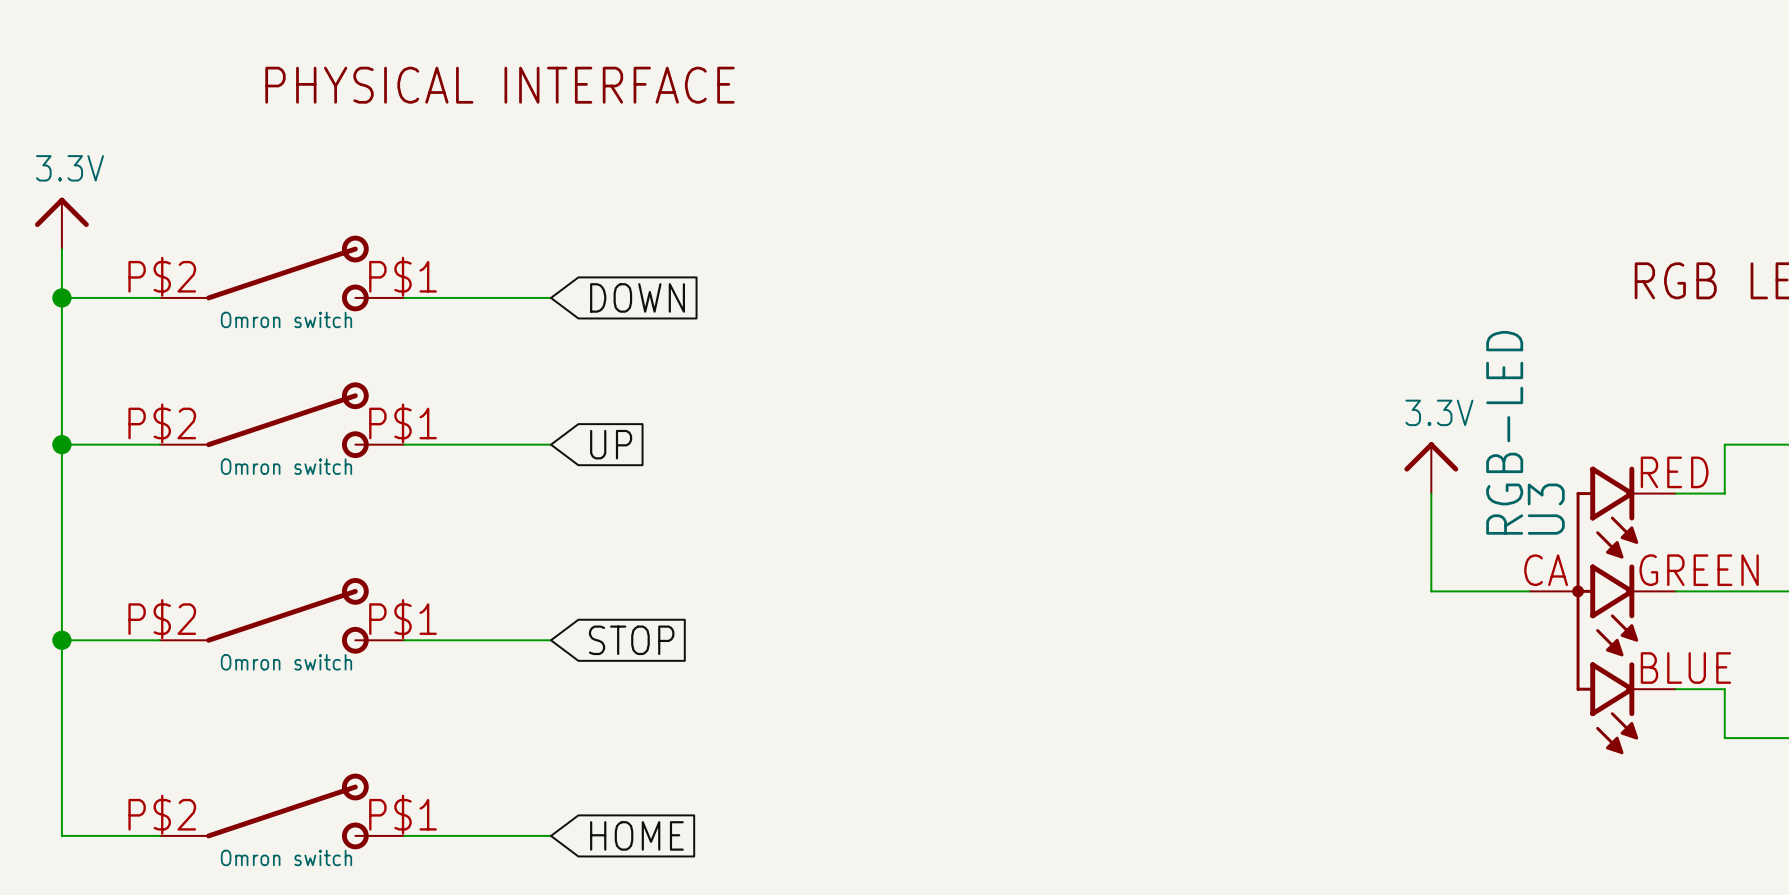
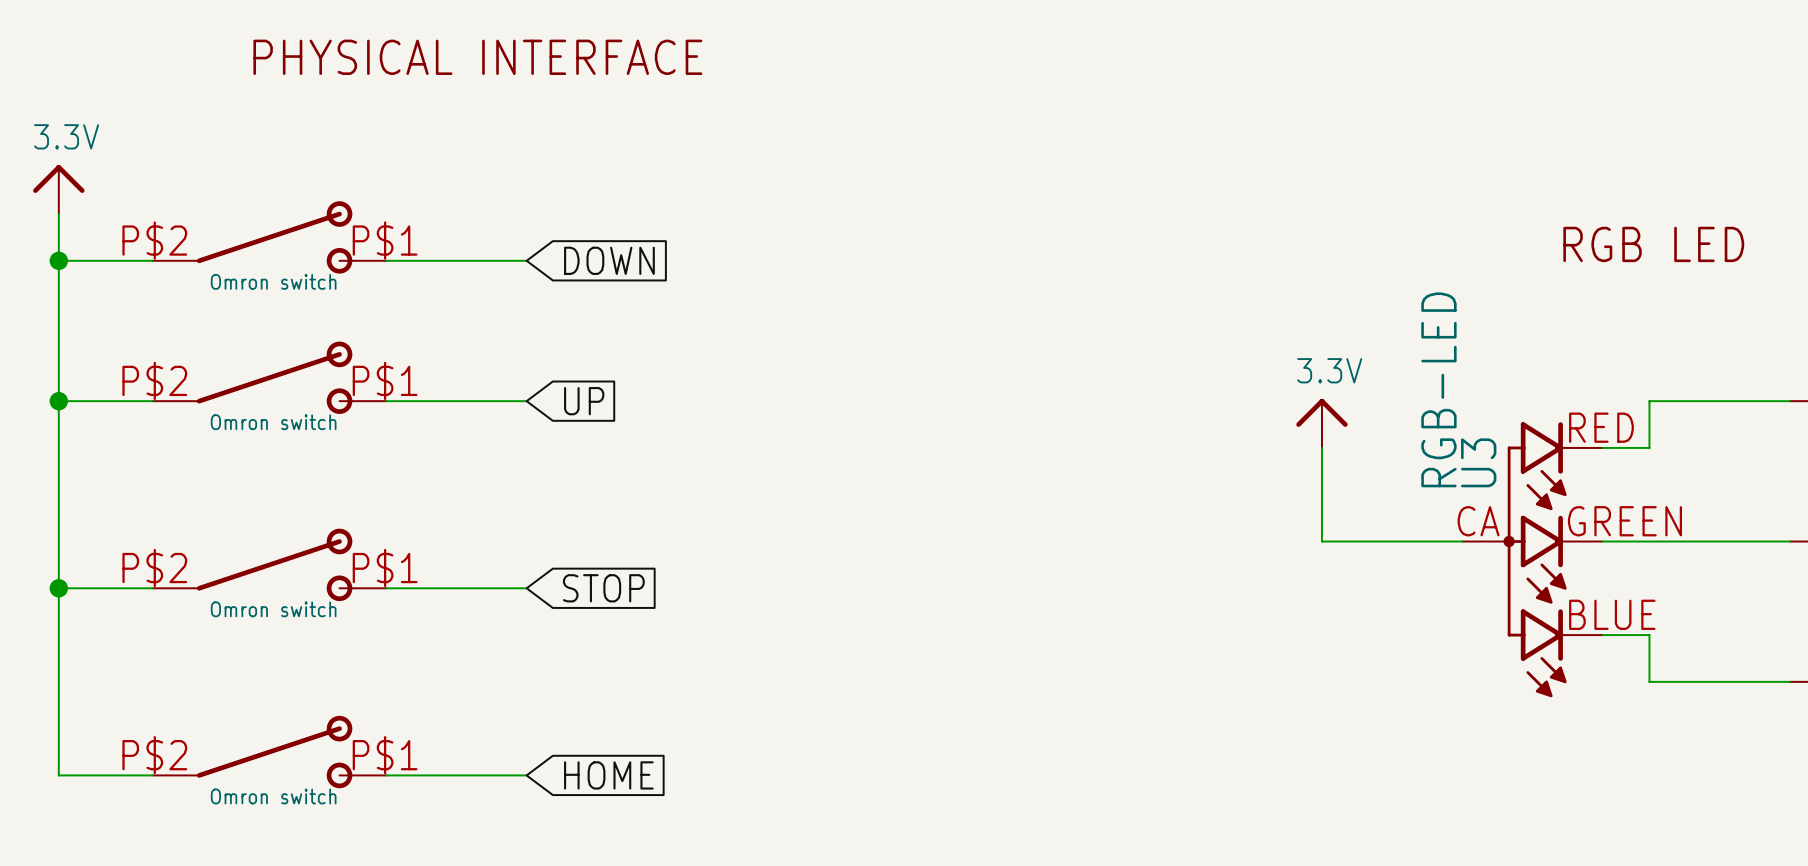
power symbol position: 3.3V (1431, 467) -> 3.3V (1321, 423)
wire: (1431, 493) (1431, 591) -> (1321, 447) (1321, 541) (1368, 541)

